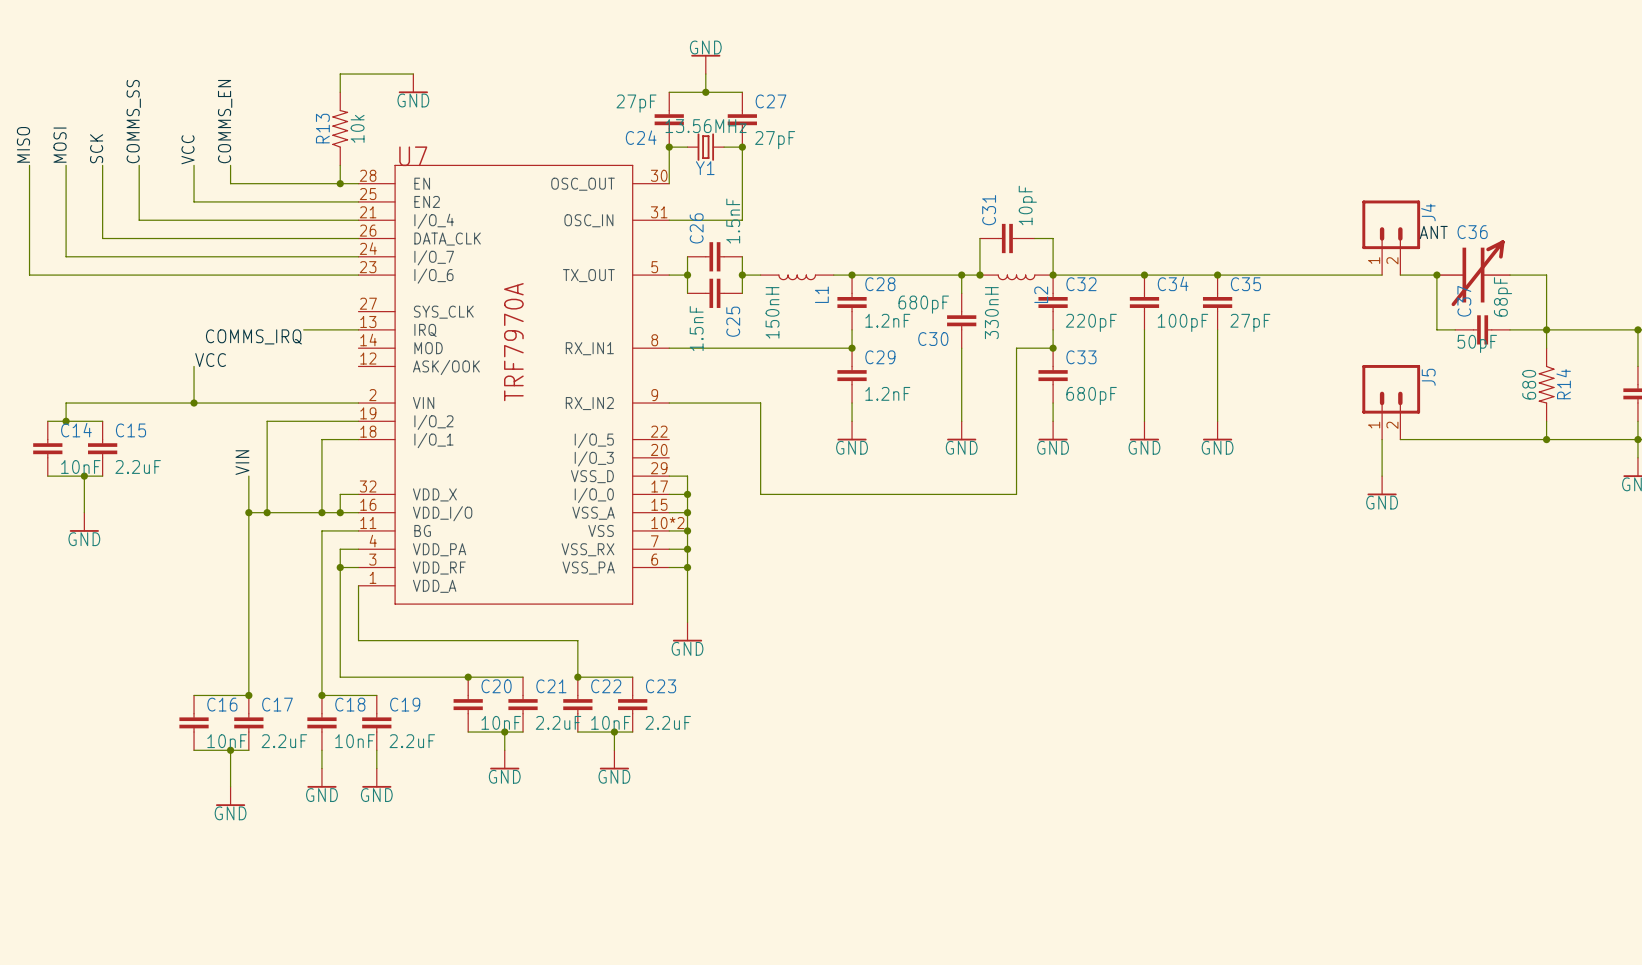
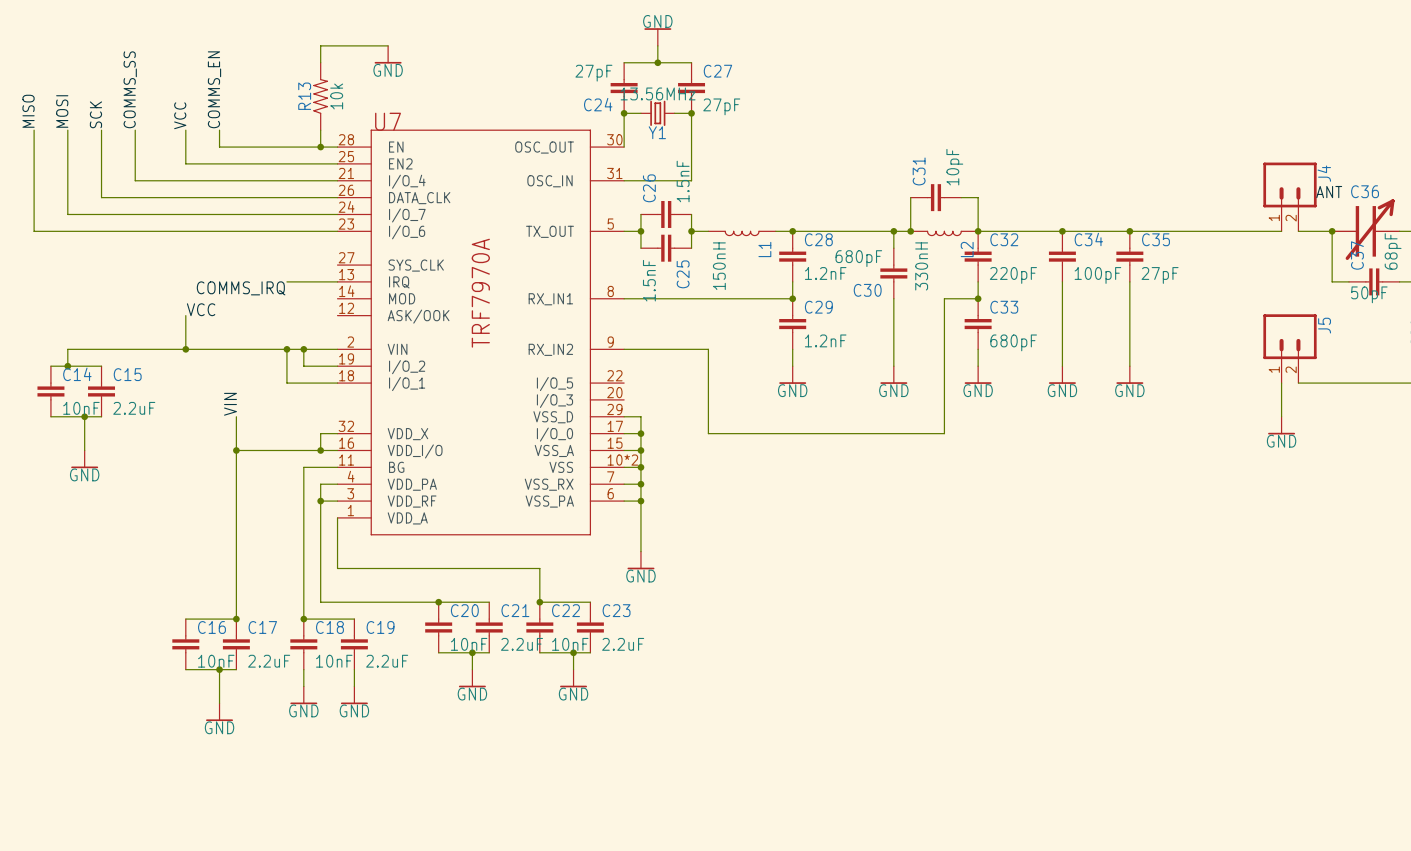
junction: none -> (286, 349)
junction: none -> (303, 349)
wire: (321, 421) (267, 421) (267, 512) -> (303, 366) (303, 349)
wire: (321, 439) (321, 512) -> (303, 383) (286, 383) (286, 349)
junction: (267, 512) -> none
junction: (321, 512) -> none

